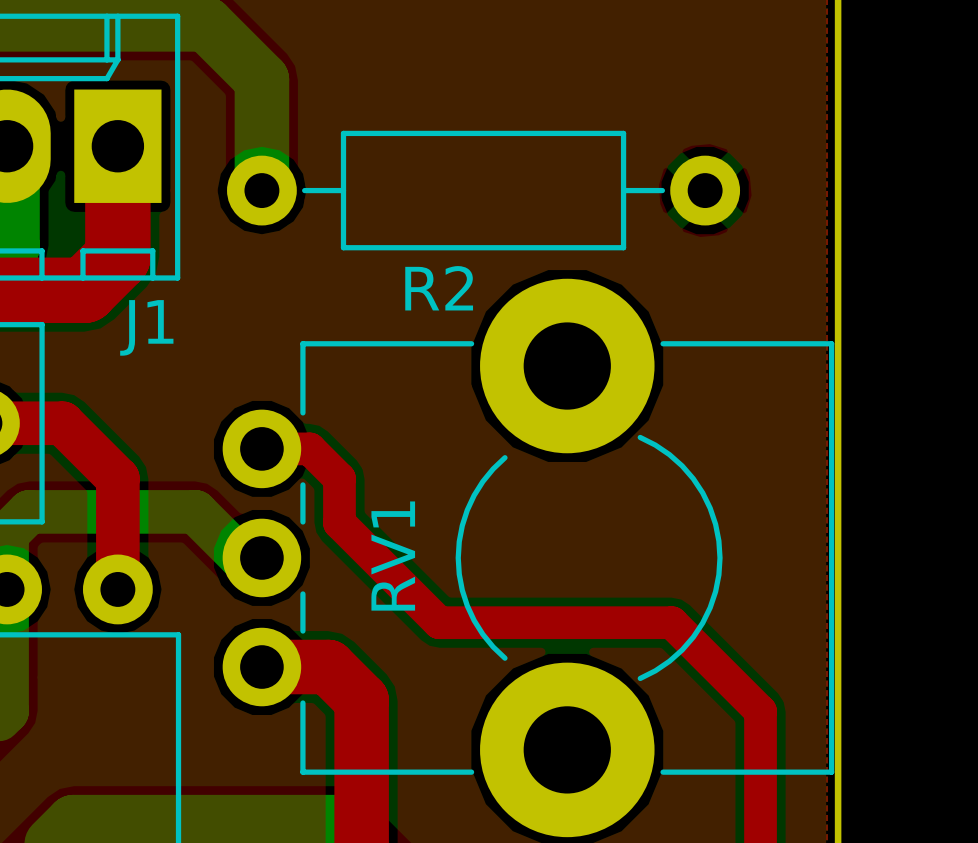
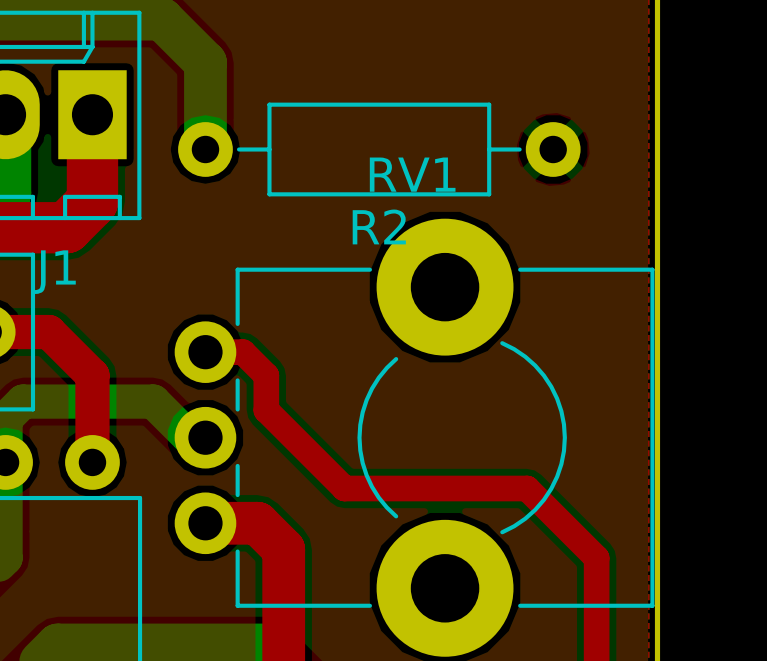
R2 name position: R2 (439, 288) -> R2 (379, 226)
J1 name position: J1 (146, 327) -> J1 (54, 272)
RV1 name rotation: 0° (393, 556) -> 90° clockwise (412, 174)
RV1 name position: RV1 (393, 556) -> RV1 (412, 174)

